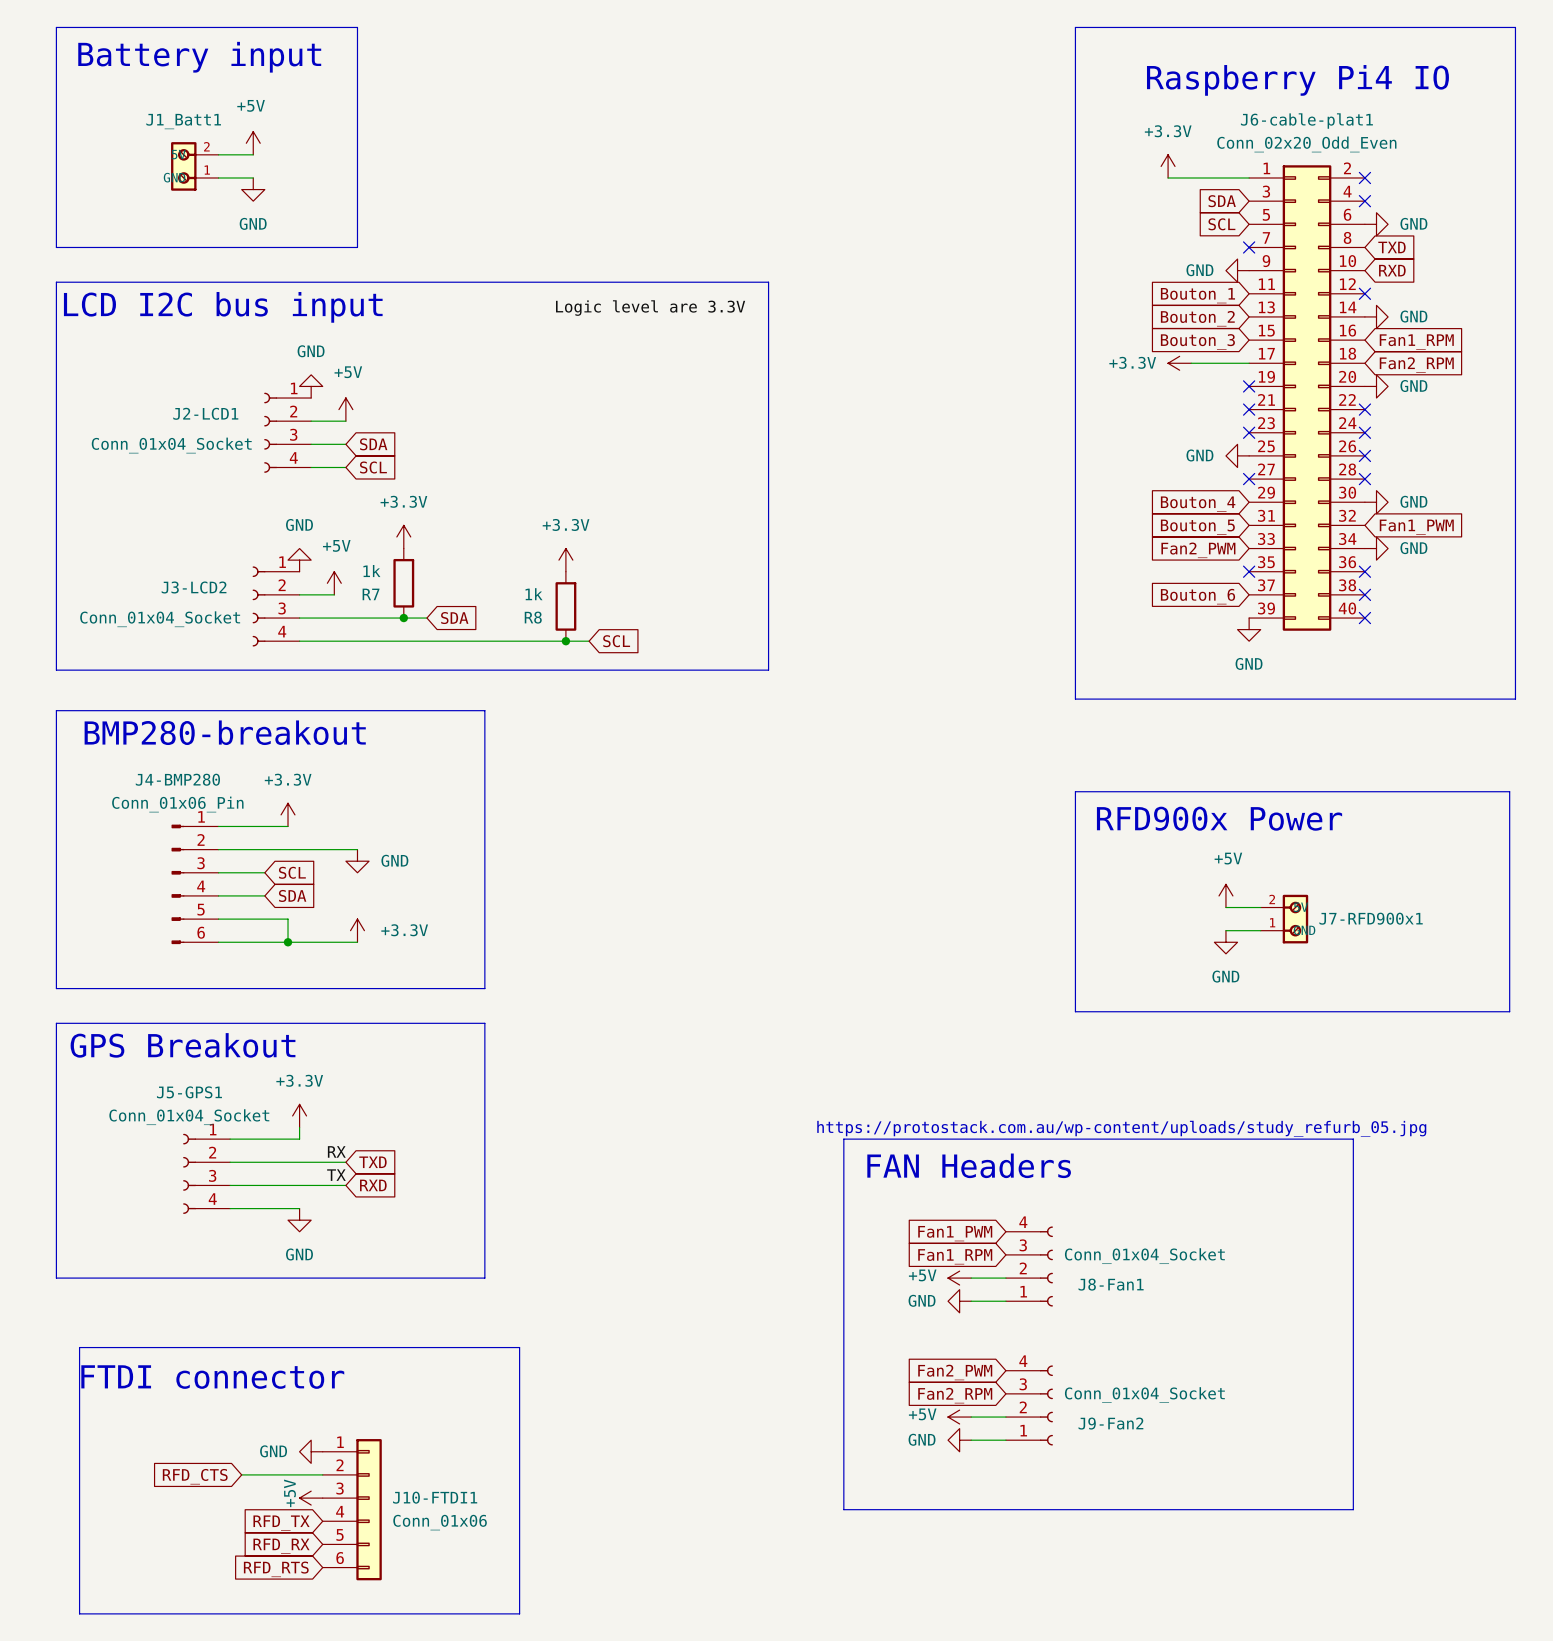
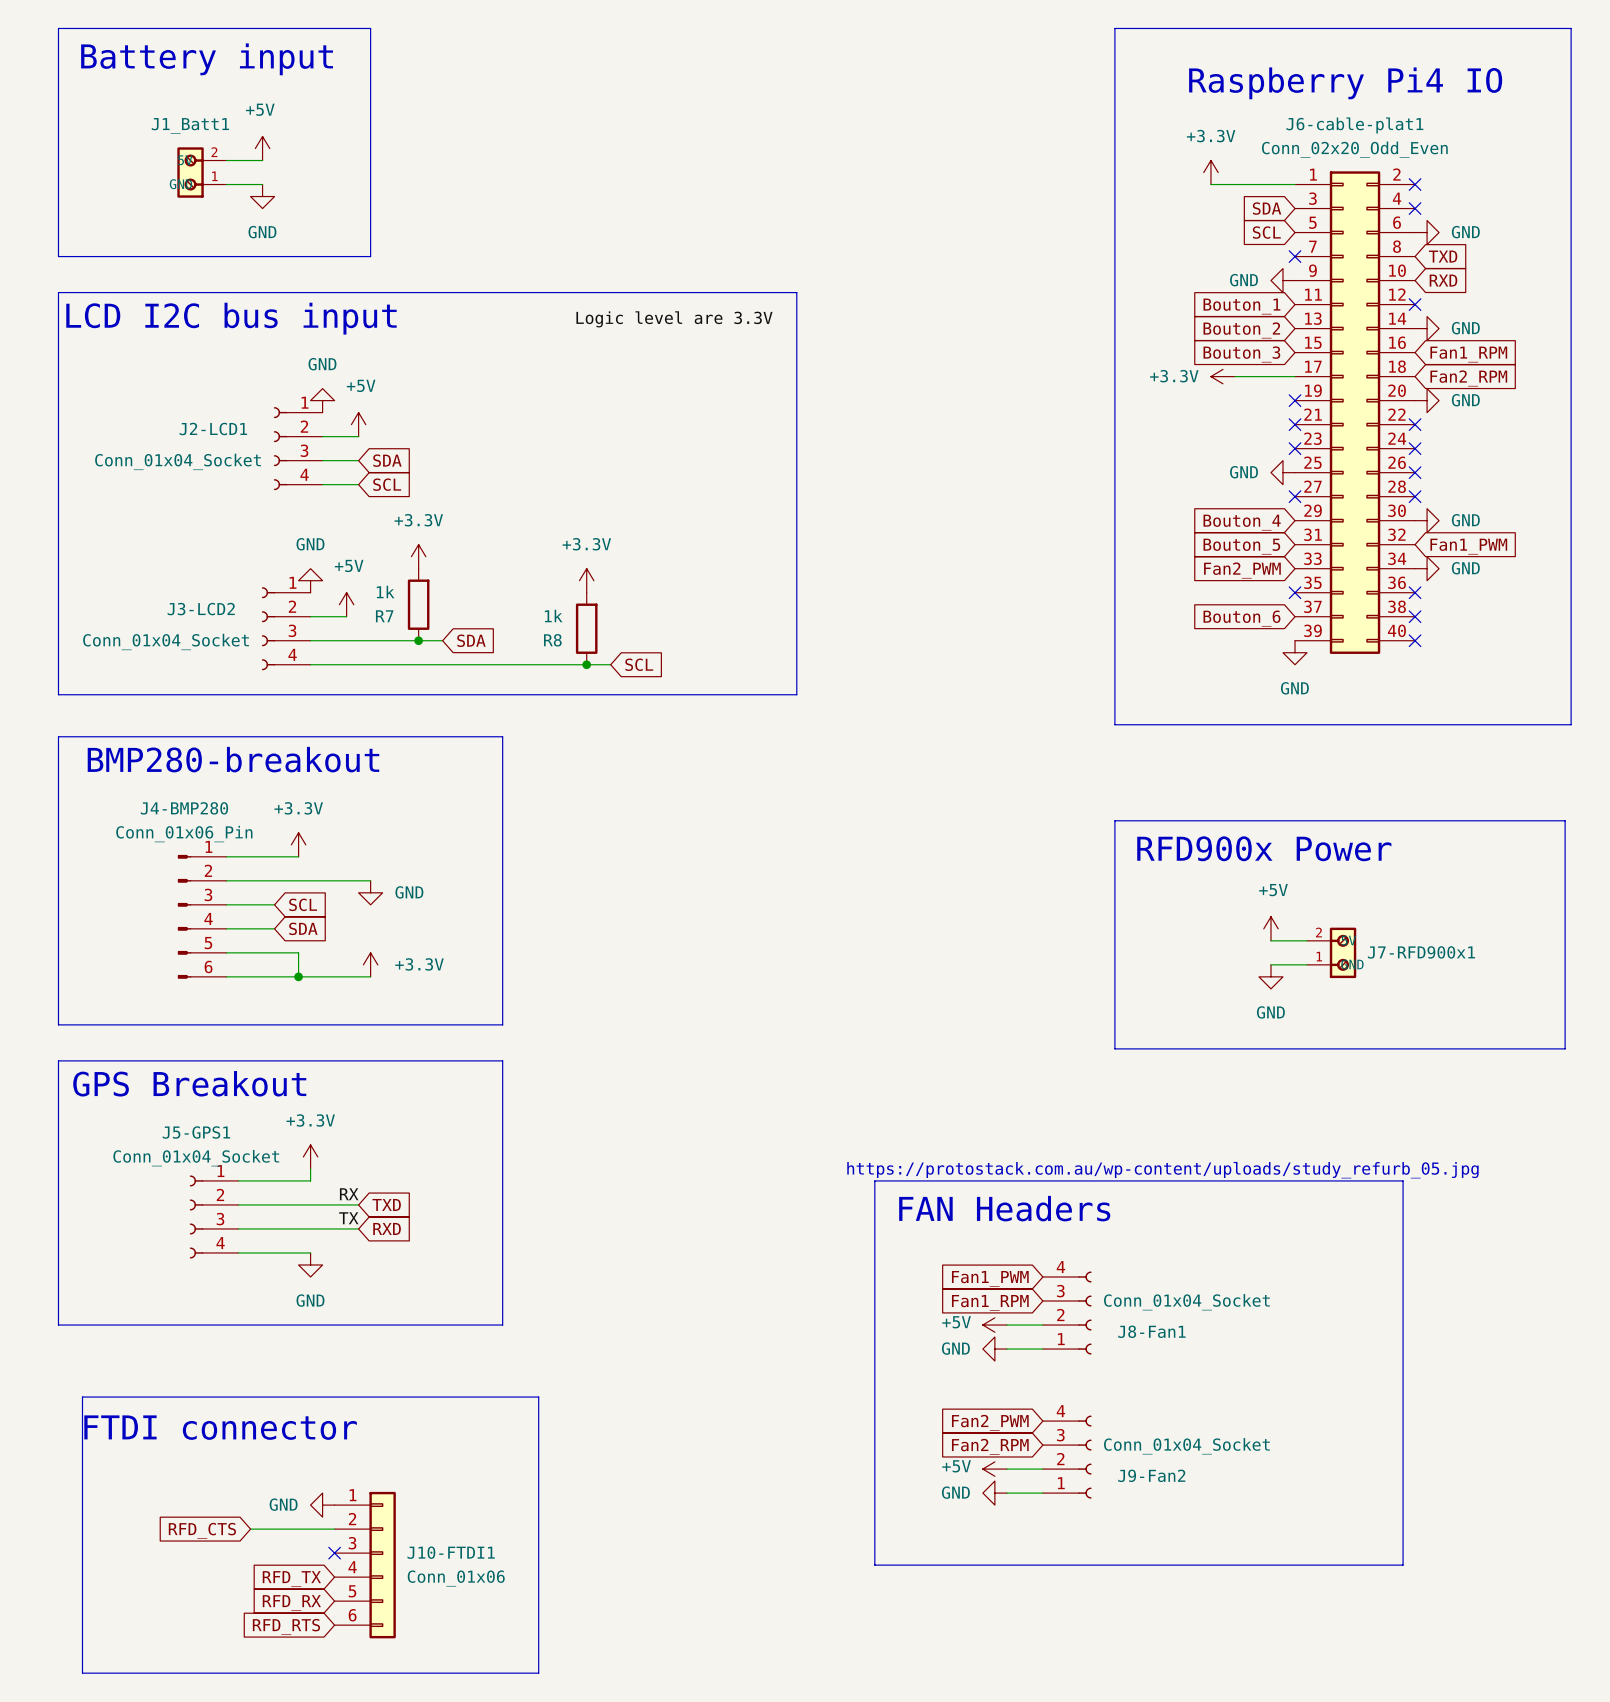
power symbol: +5V (311, 1498) -> none
no-connect mark: none -> (334, 1553)

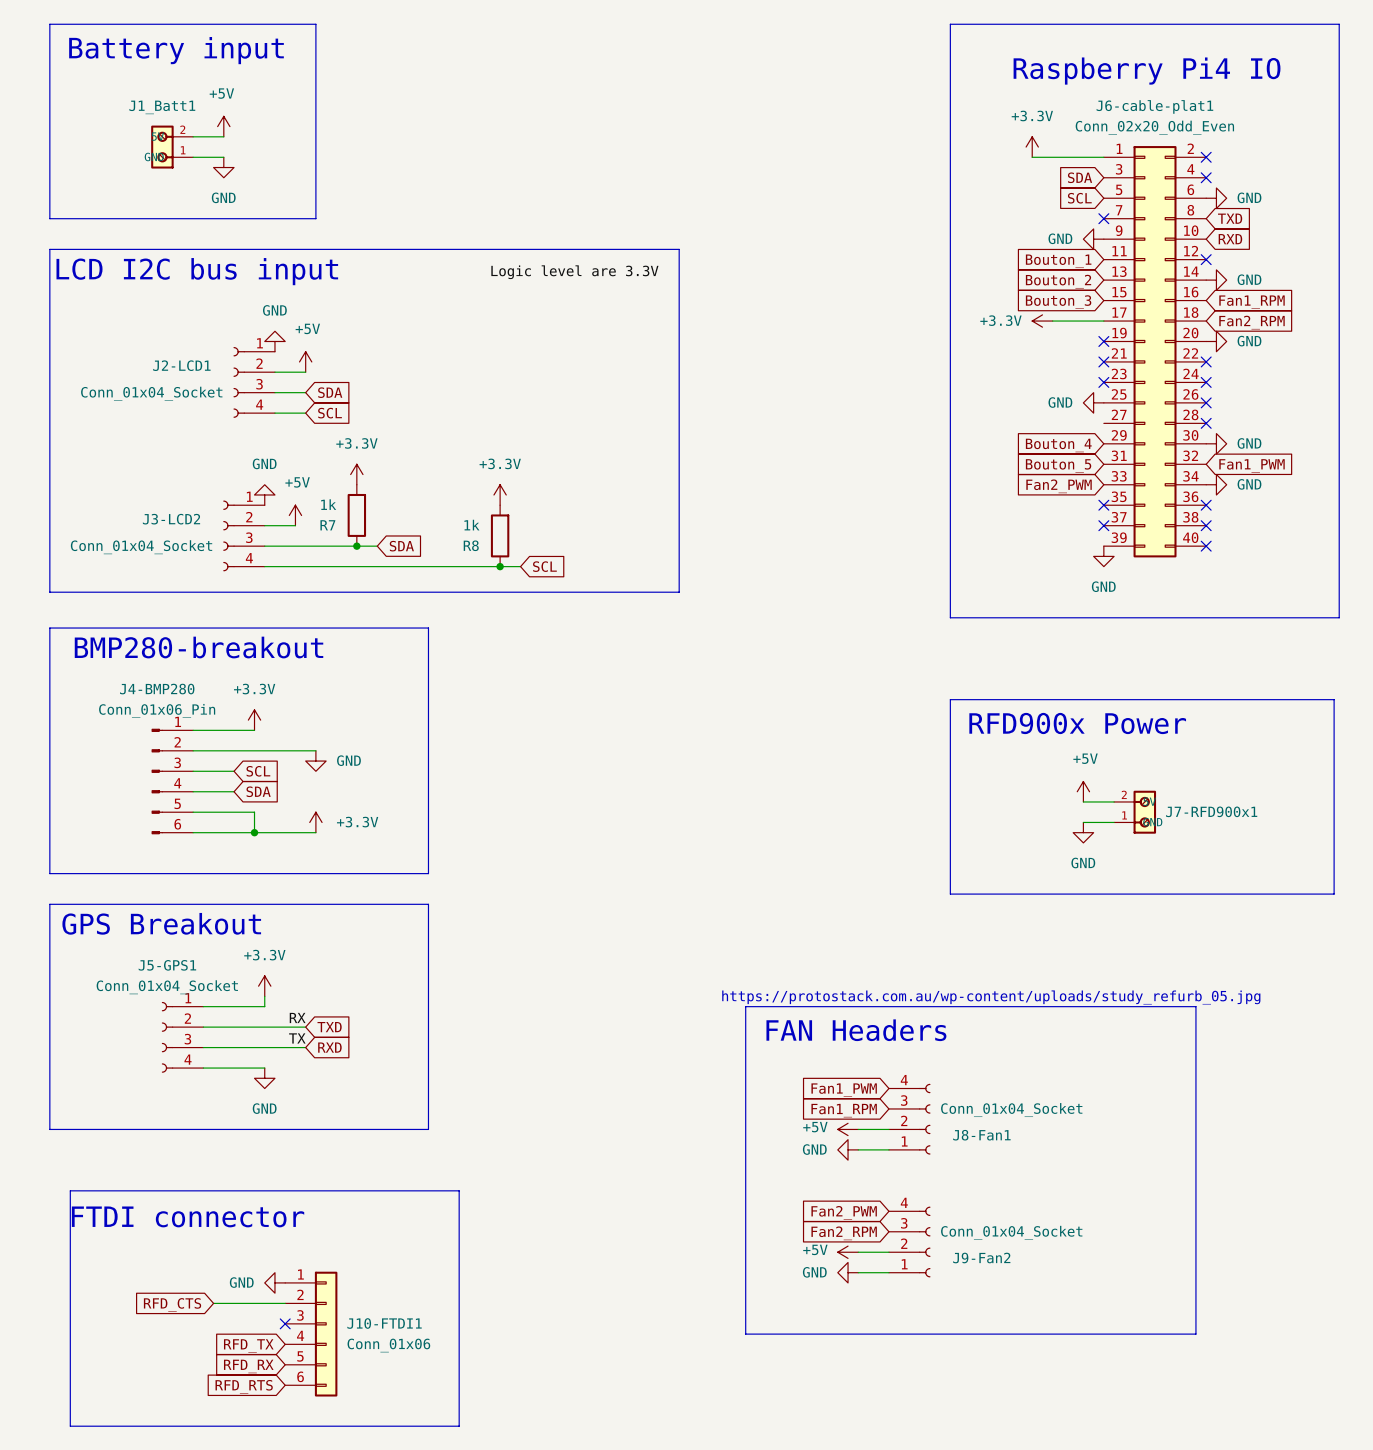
no-connect mark: (1295, 496) -> none
no-connect mark: none -> (1103, 525)
global label: Bouton_6 (1241, 618) -> none

